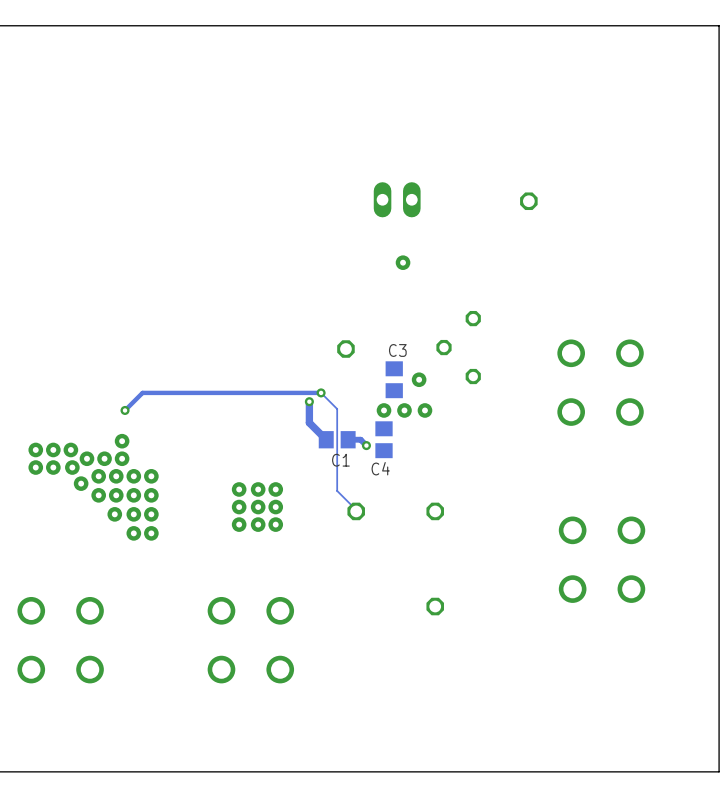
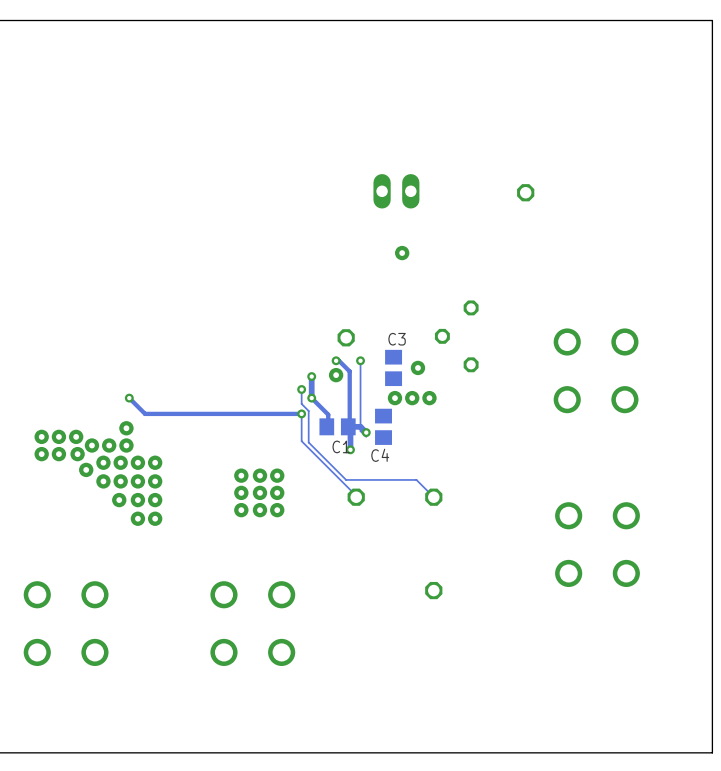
track: none -> (336, 360) (338, 360) (349, 371) (350, 449)
via: none -> (336, 360)
track: none -> (360, 360) (360, 431) (366, 436)
via: none -> (360, 360)
via: none -> (336, 375)
track: none -> (311, 376) (311, 398) (328, 414) (328, 432)
via: none -> (311, 376)
via: (321, 392) -> none
track: none -> (301, 389) (301, 403) (308, 410) (308, 442) (346, 479) (416, 479) (433, 497)
via: none -> (301, 389)
track: (309, 401) (309, 422) (326, 439) -> none
via: (309, 401) -> none
track: (125, 410) (142, 392) (321, 392) (337, 409) (337, 490) -> (129, 398) (145, 413) (301, 413) (301, 441) (337, 477)
via: none -> (311, 398)
via: (384, 410) -> none
via: none -> (395, 398)
via: (404, 410) -> none
via: none -> (412, 398)
via: (424, 410) -> none
via: none -> (429, 398)
via: none -> (301, 413)
via: none -> (350, 449)

